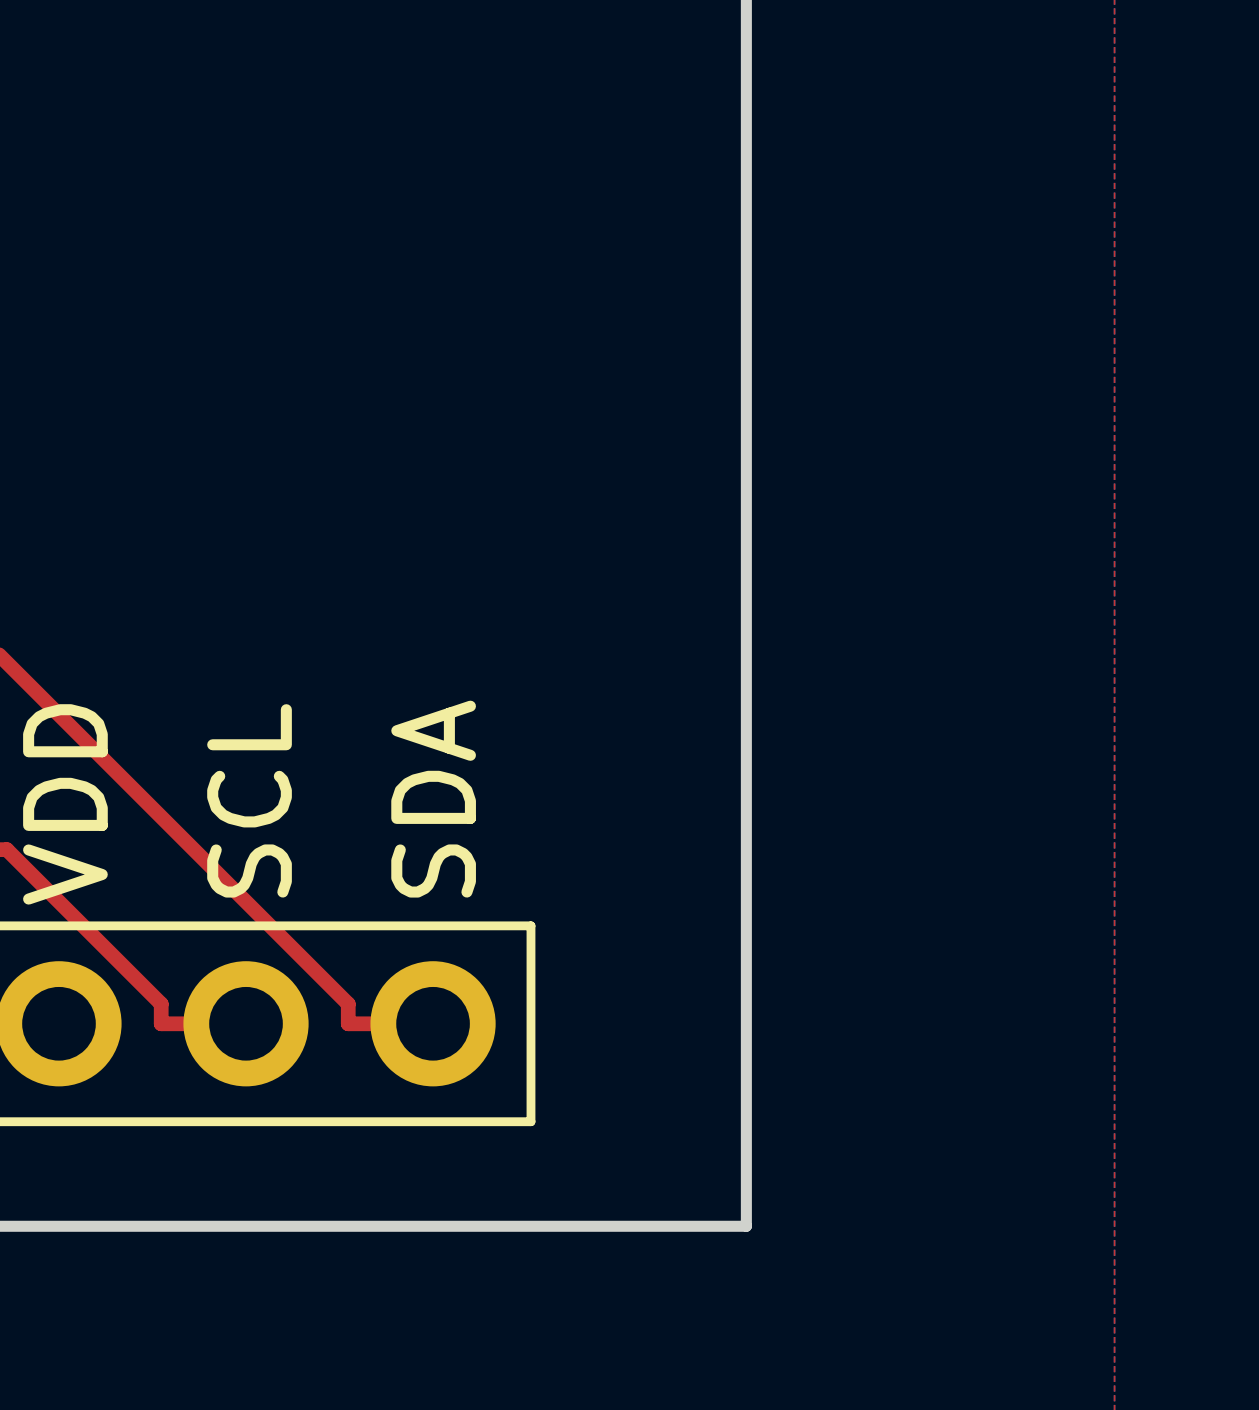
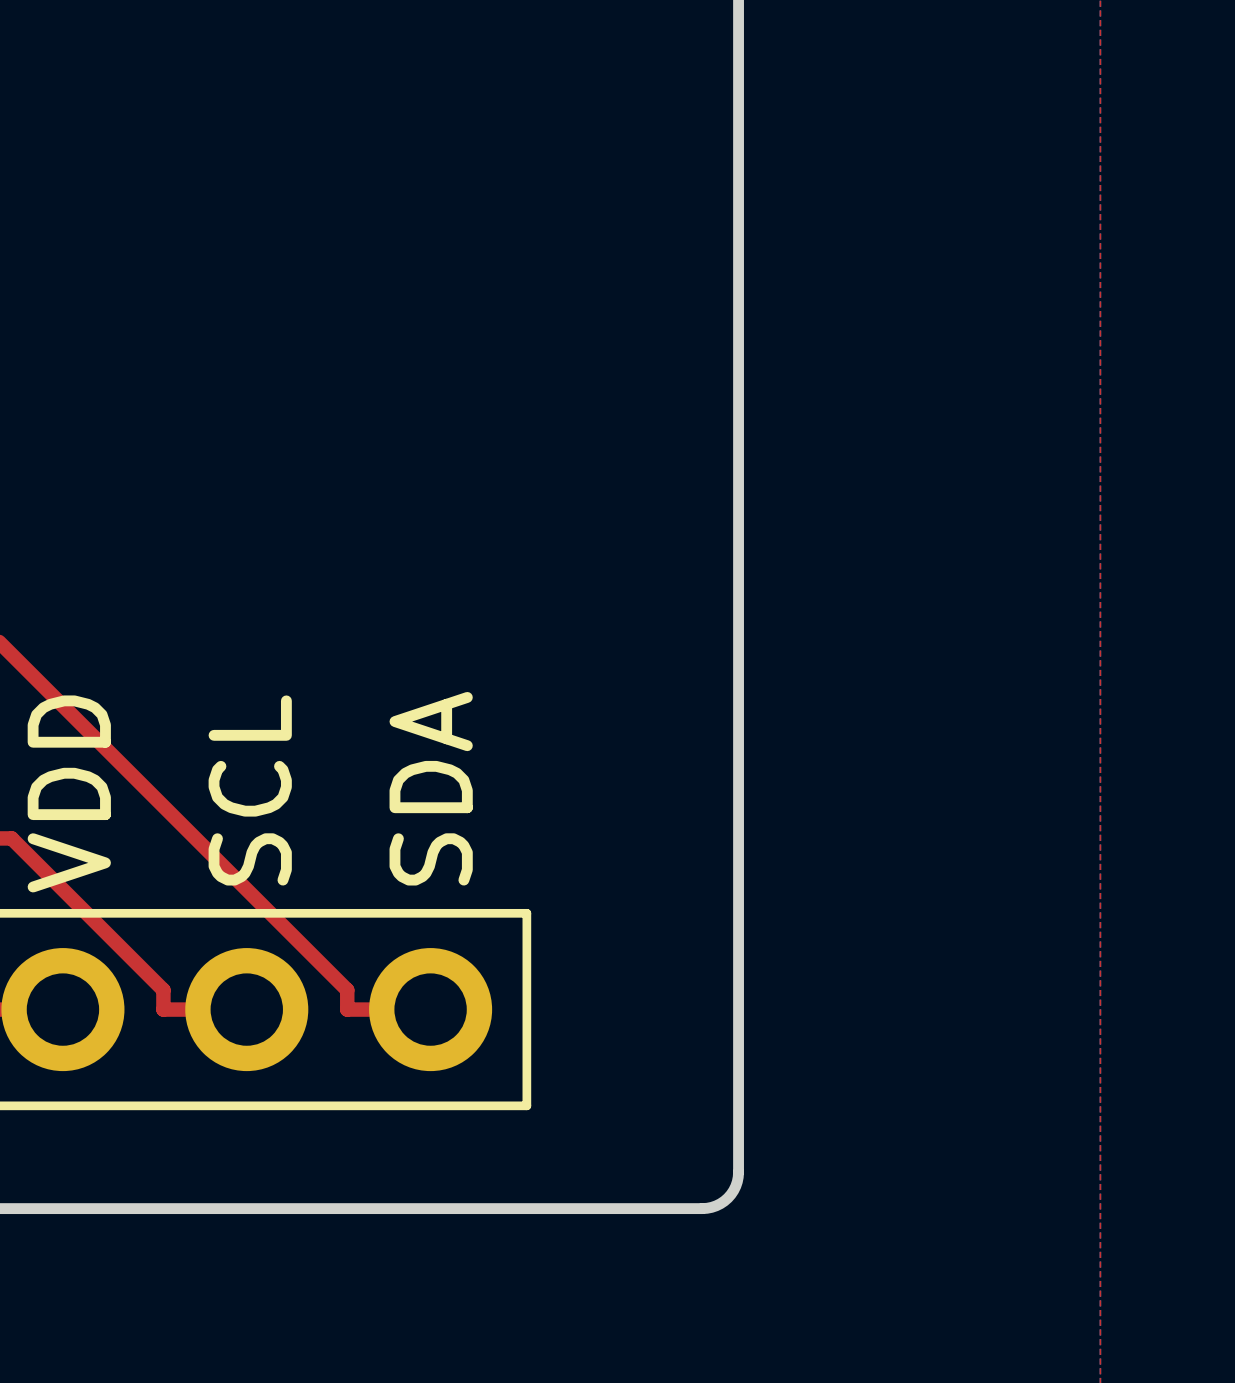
board edge: (746, 1189) (746, 1226) (709, 1226) -> (738, 1172) (735, 1186) (727, 1198) (716, 1205) (702, 1208)

